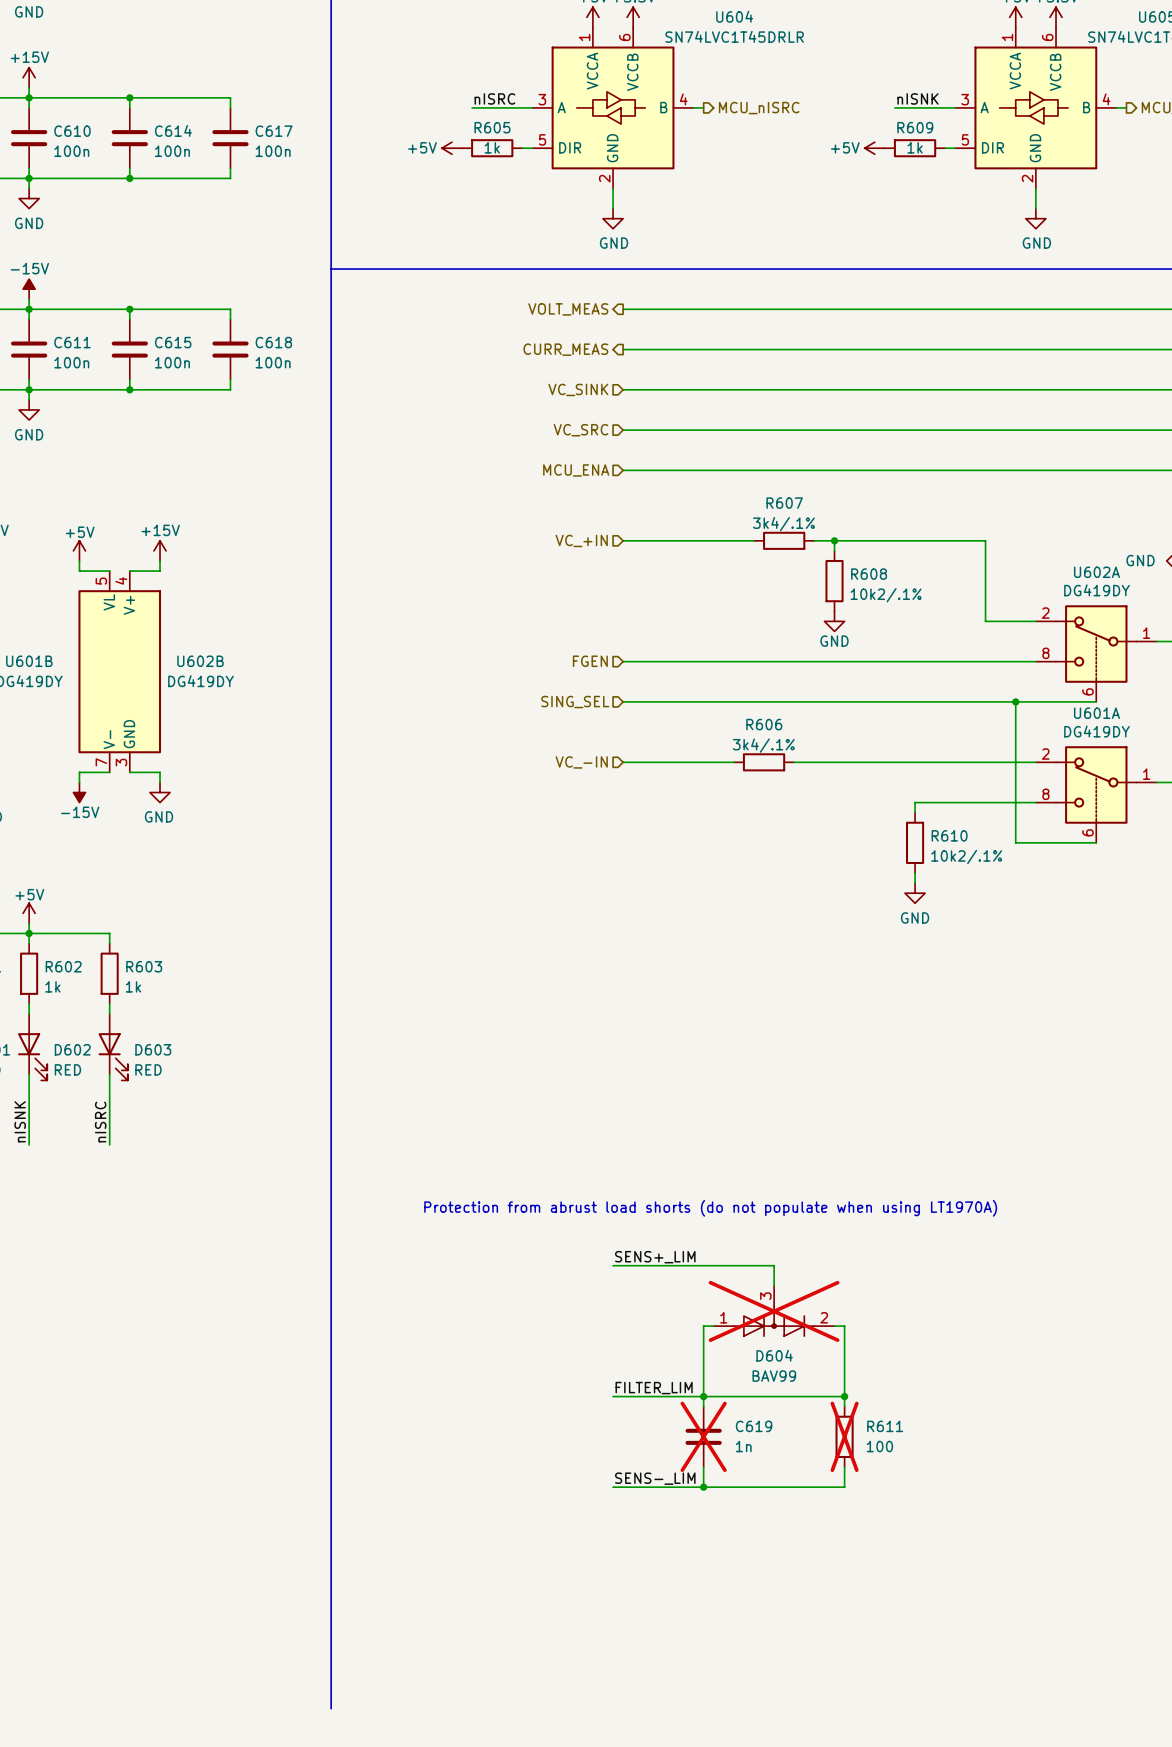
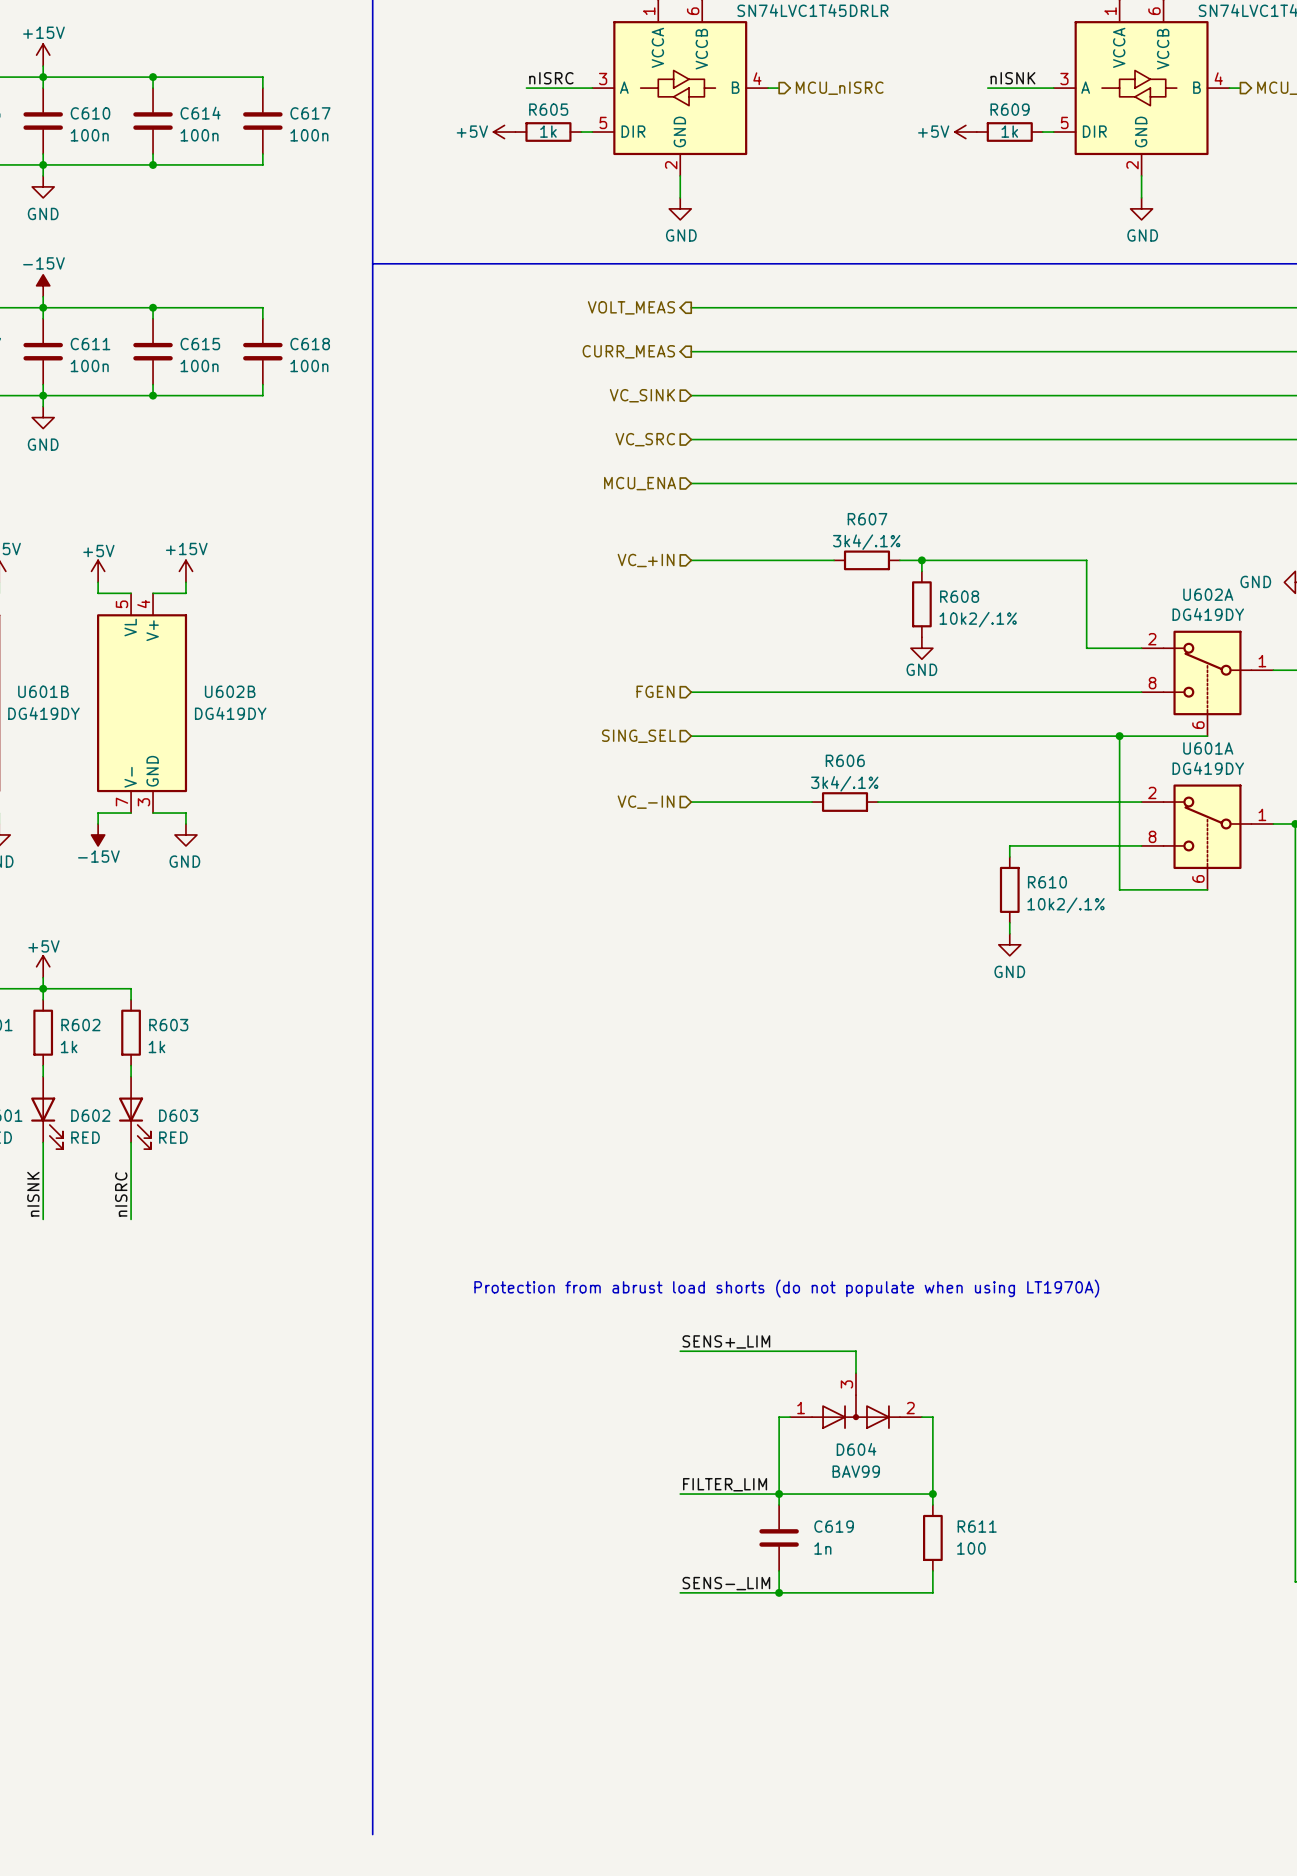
D604 do-not-place cross: (774, 1311) -> none
C619 do-not-place cross: (703, 1436) -> none
R611 do-not-place cross: (844, 1436) -> none

